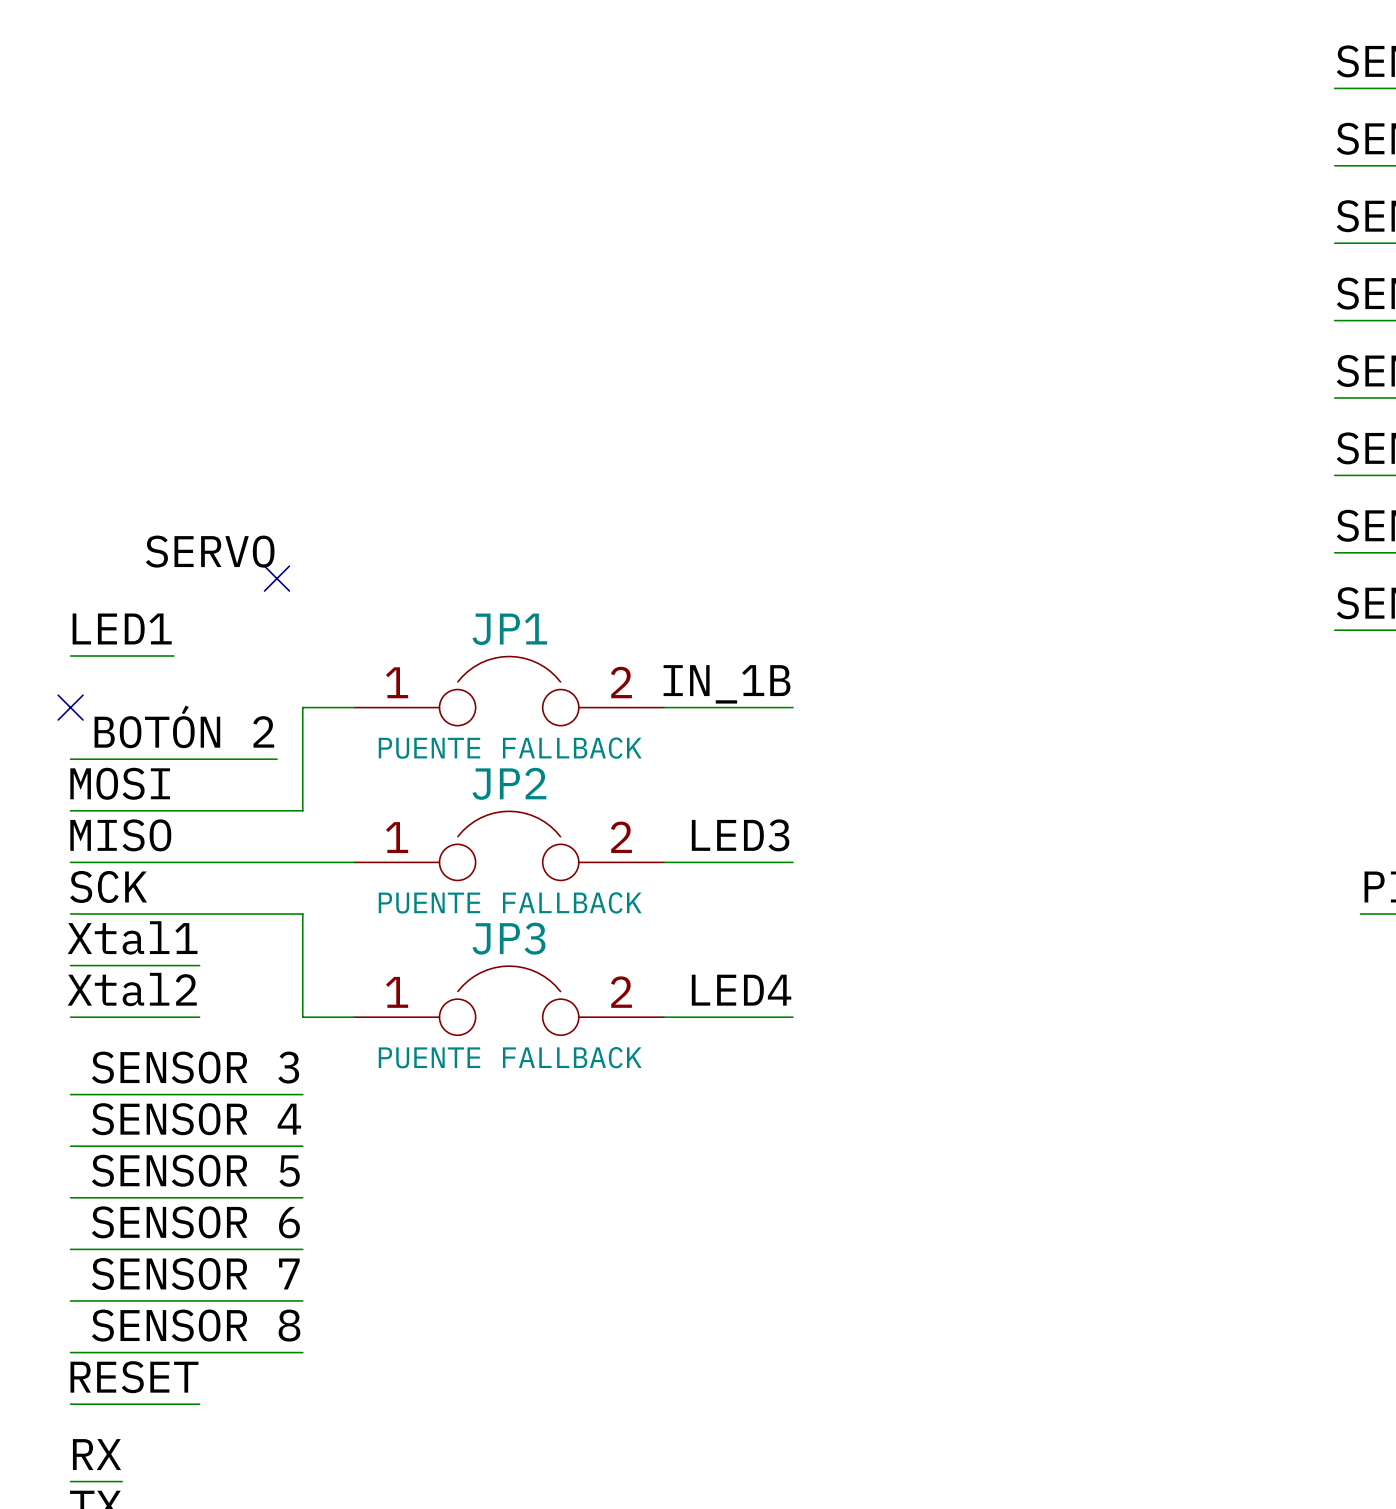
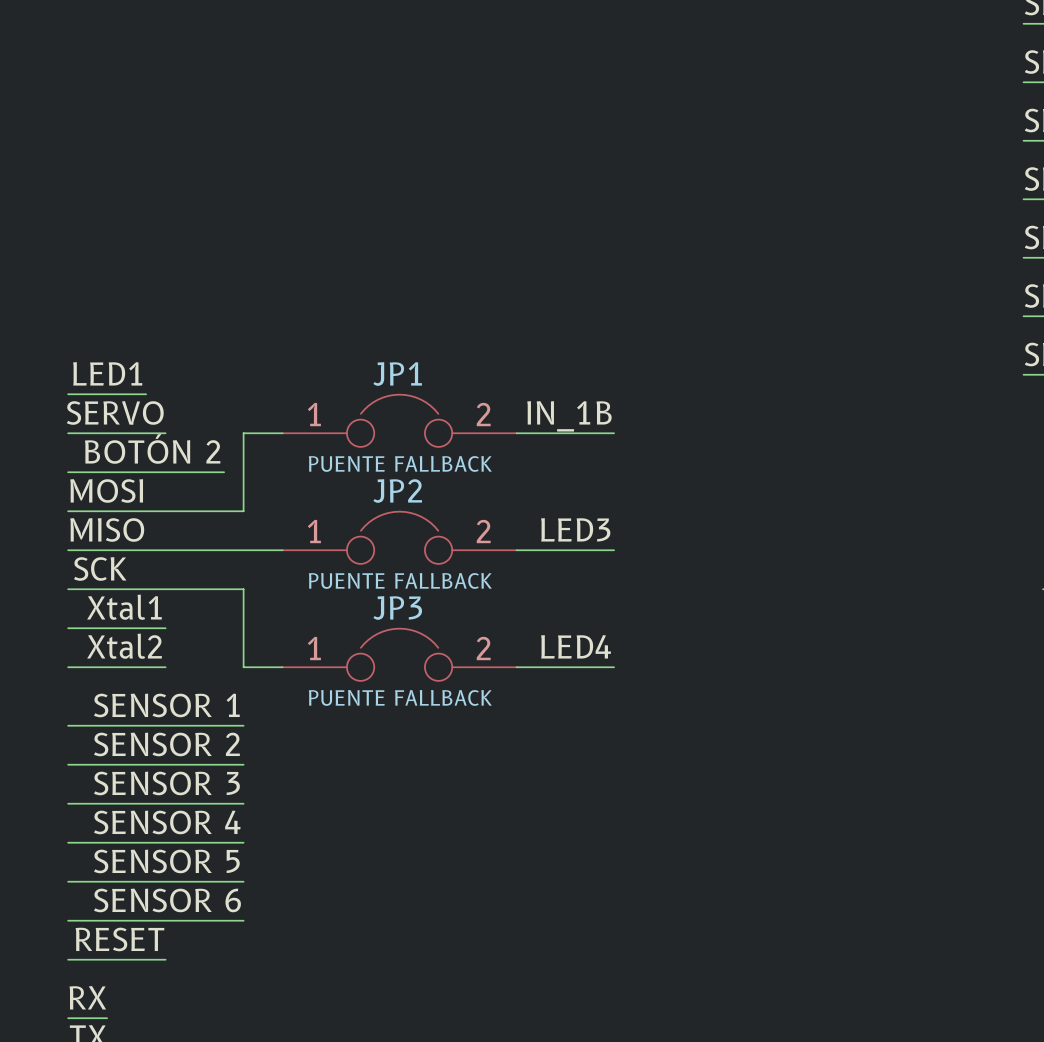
label position: SERVO (210, 551) -> SERVO (115, 413)
no-connect mark: (276, 578) -> none
wire: none -> (68, 433) (165, 433)
no-connect mark: (70, 707) -> none
label: SENSOR 3 (195, 1067) -> SENSOR 1 (166, 705)
label: SENSOR 4 (196, 1119) -> SENSOR 2 (166, 744)
label: SENSOR 5 (195, 1170) -> SENSOR 3 (166, 783)
label: SENSOR 6 (195, 1222) -> SENSOR 4 (167, 822)
label: SENSOR 7 (195, 1273) -> SENSOR 5 (166, 861)
label: SENSOR 8 (196, 1325) -> SENSOR 6 (167, 900)

